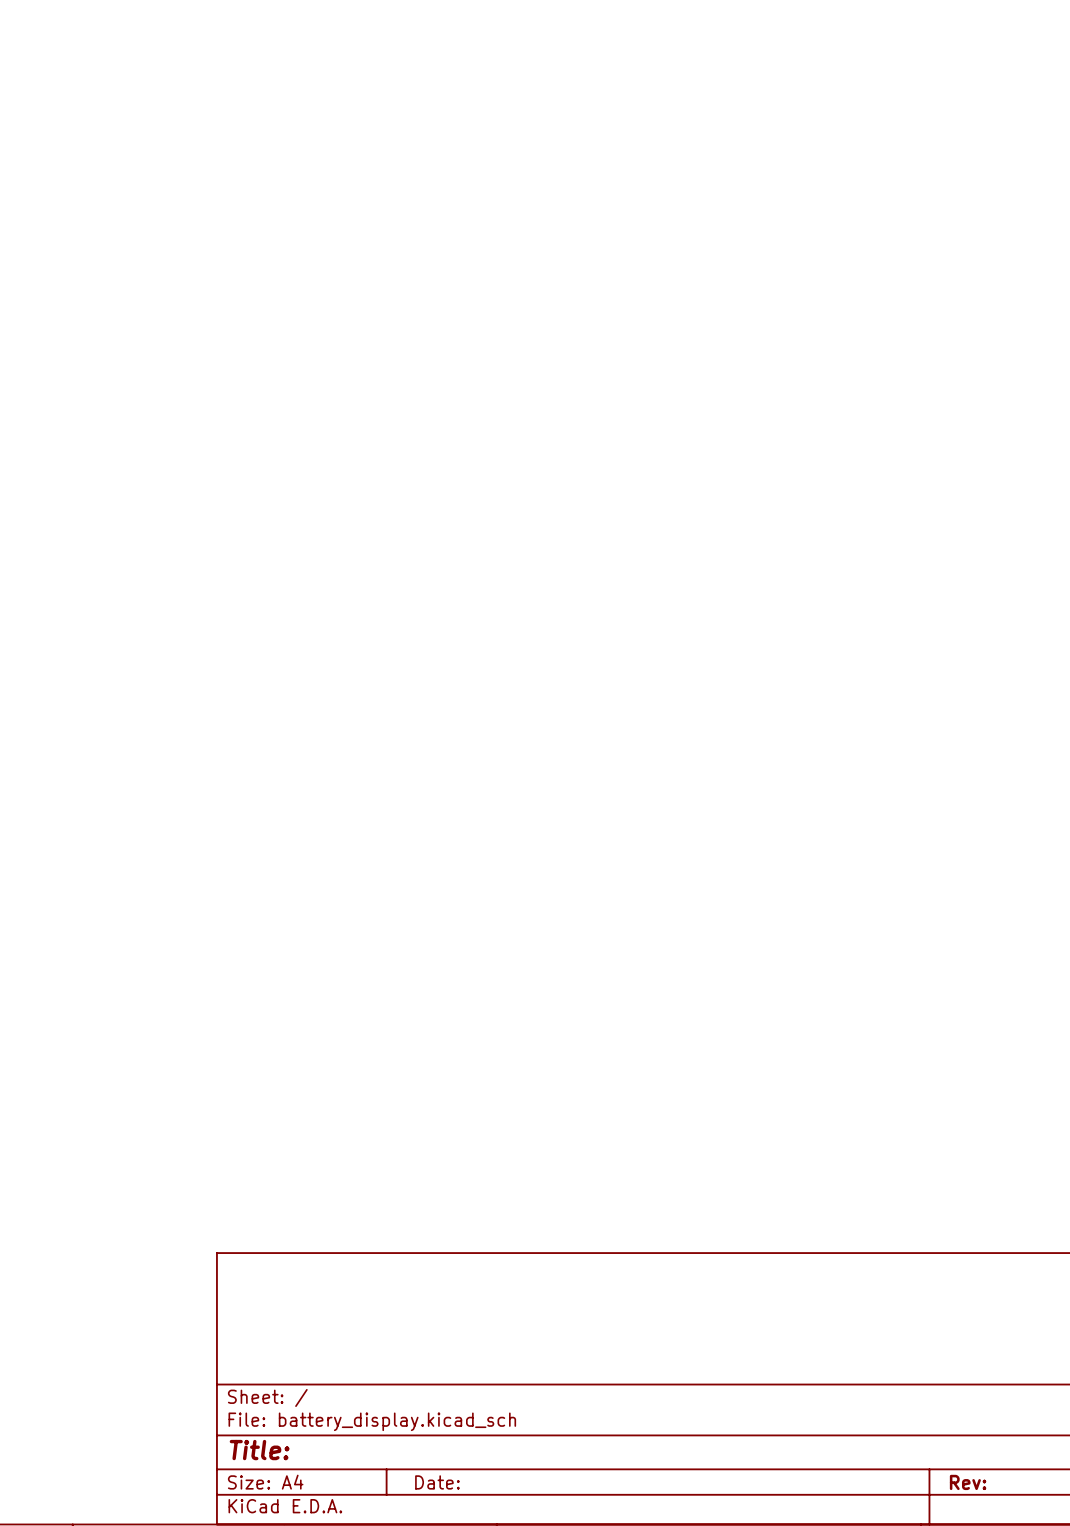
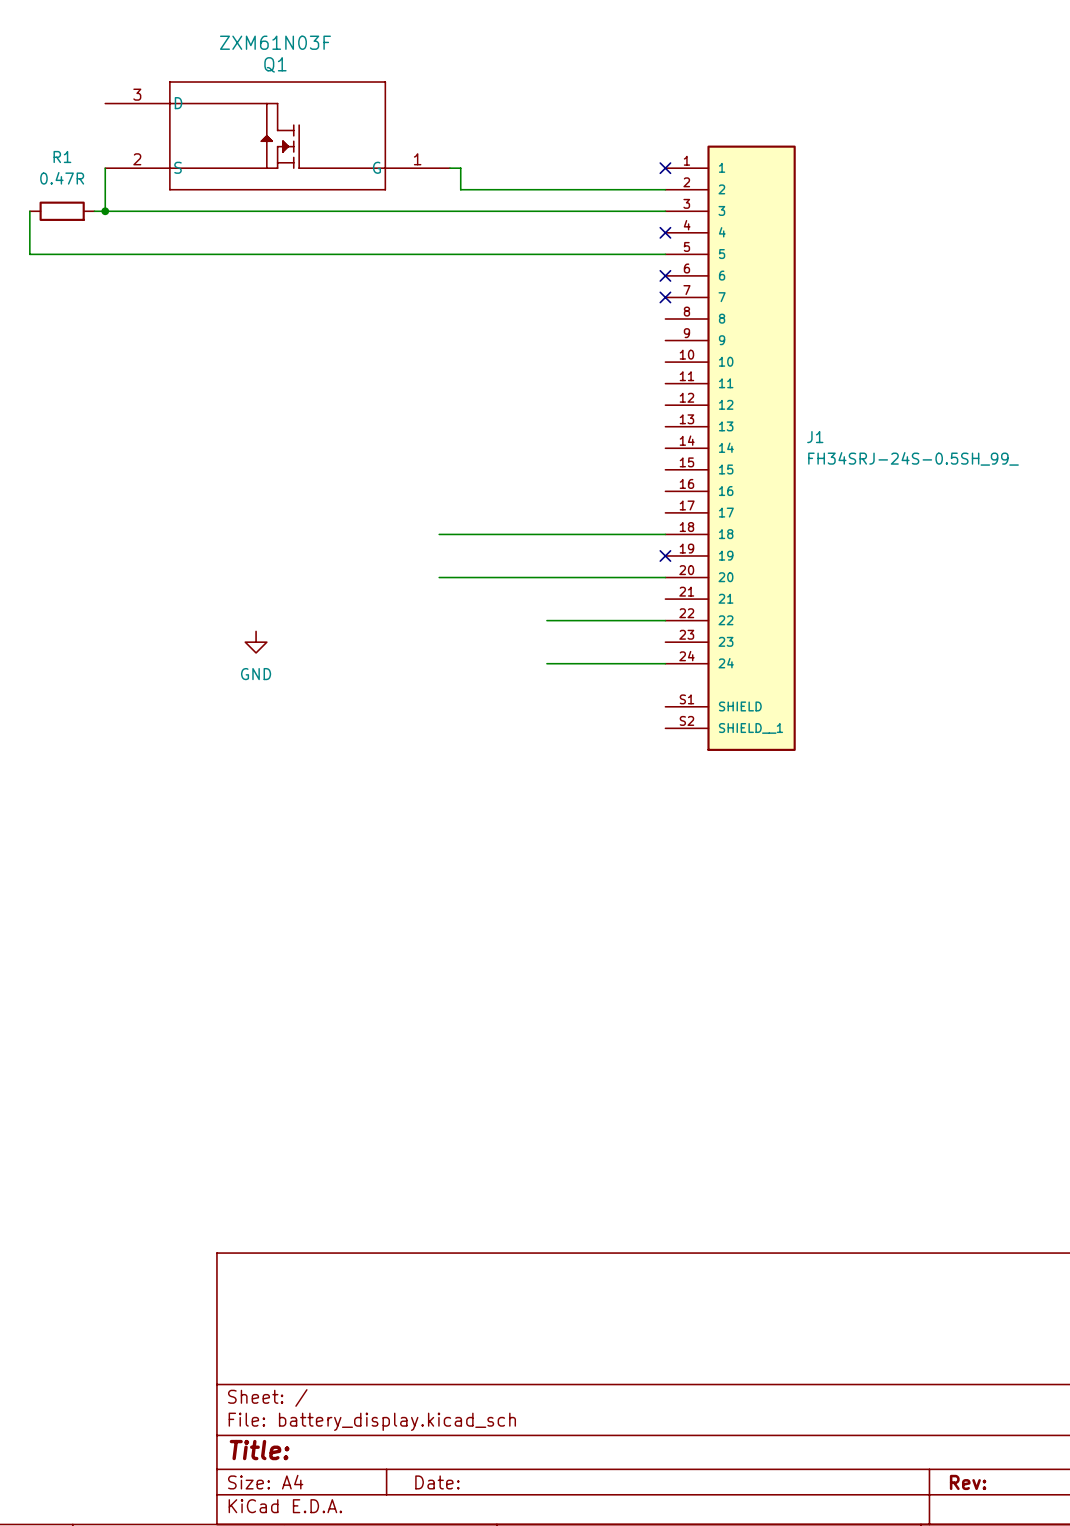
Q1: none -> ZXM61N03F (277, 135)
wire: none -> (105, 168) (105, 211)
wire: none -> (449, 168) (460, 168) (460, 189) (665, 189)
no-connect mark: none -> (665, 168)
wire: none -> (29, 211) (29, 254) (665, 254)
R1: none -> 0.47R (62, 211)
wire: none -> (94, 211) (665, 211)
junction: none -> (105, 211)
no-connect mark: none -> (665, 232)
no-connect mark: none -> (665, 275)
no-connect mark: none -> (665, 297)
J1: none -> FH34SRJ-24S-0.5SH_99_ (730, 448)
wire: none -> (439, 534) (665, 534)
no-connect mark: none -> (665, 555)
wire: none -> (439, 577) (665, 577)
wire: none -> (546, 620) (665, 620)
power symbol: none -> GND (256, 642)
wire: none -> (546, 663) (665, 663)

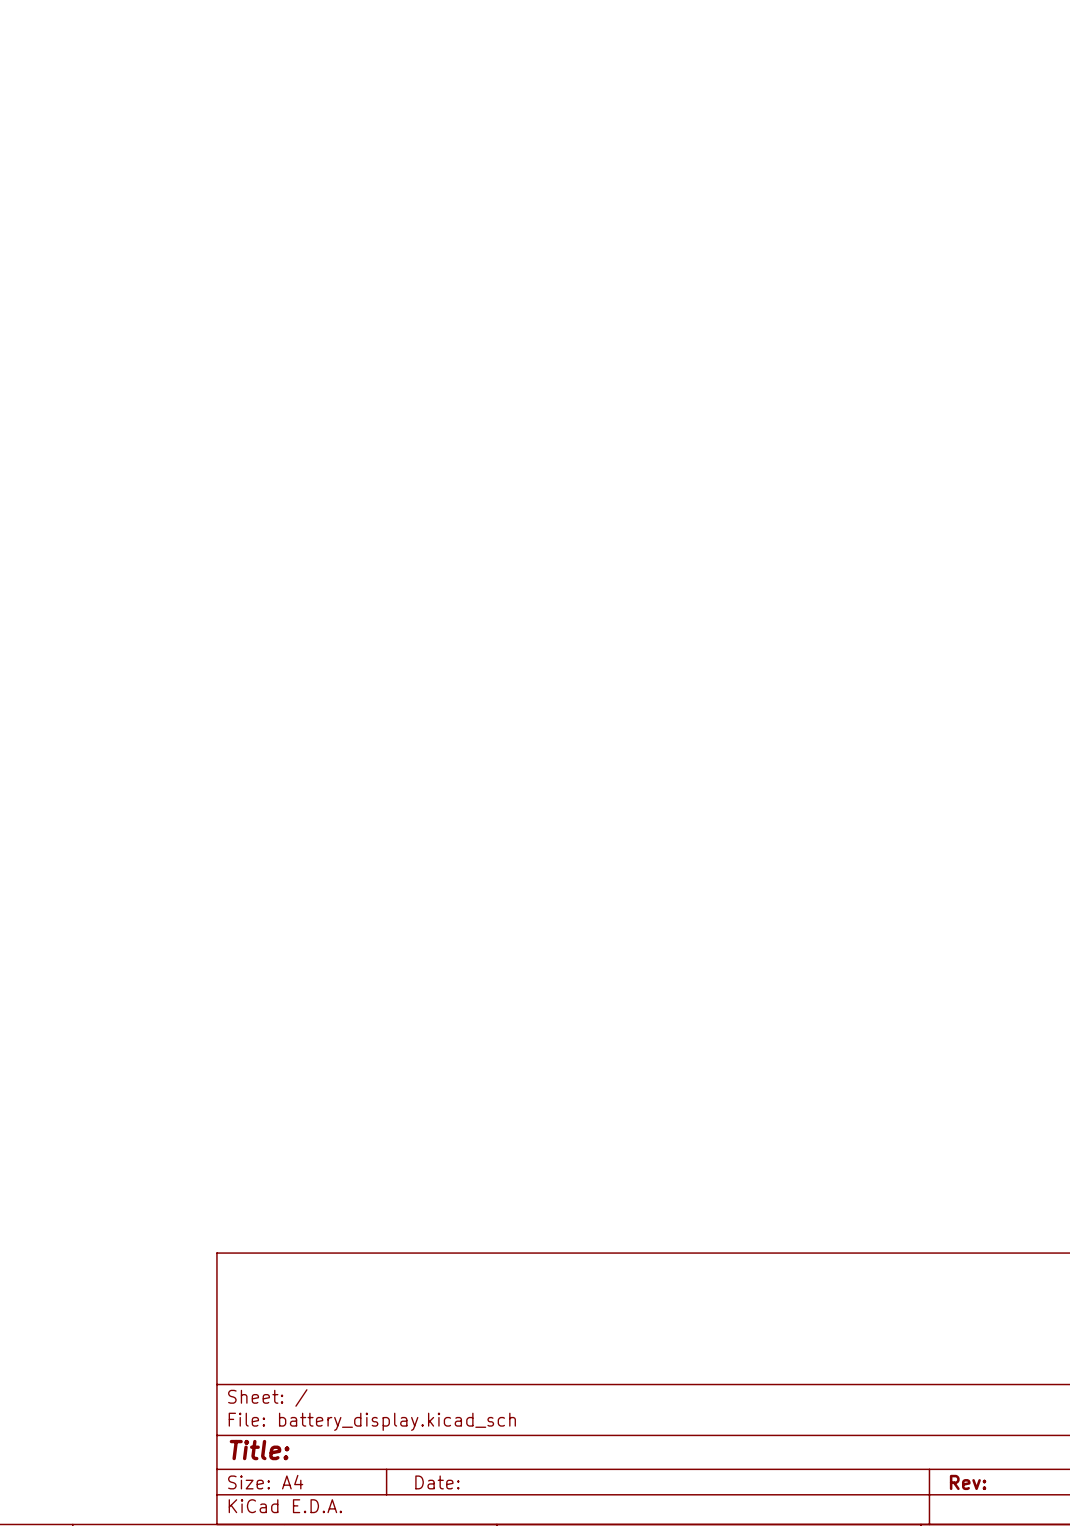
Q1: ZXM61N03F (277, 135) -> none
wire: (105, 168) (105, 211) -> none
wire: (449, 168) (460, 168) (460, 189) (665, 189) -> none
no-connect mark: (665, 168) -> none
wire: (29, 211) (29, 254) (665, 254) -> none
R1: 0.47R (62, 211) -> none
wire: (94, 211) (665, 211) -> none
junction: (105, 211) -> none
no-connect mark: (665, 232) -> none
no-connect mark: (665, 275) -> none
no-connect mark: (665, 297) -> none
J1: FH34SRJ-24S-0.5SH_99_ (730, 448) -> none
wire: (439, 534) (665, 534) -> none
no-connect mark: (665, 555) -> none
wire: (439, 577) (665, 577) -> none
wire: (546, 620) (665, 620) -> none
power symbol: GND (256, 642) -> none
wire: (546, 663) (665, 663) -> none

